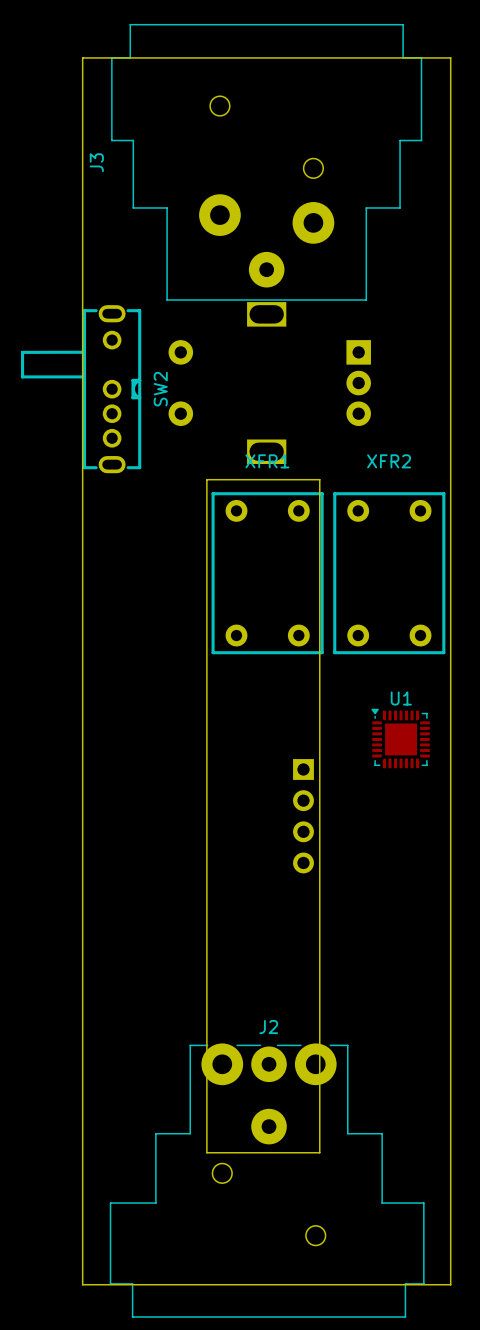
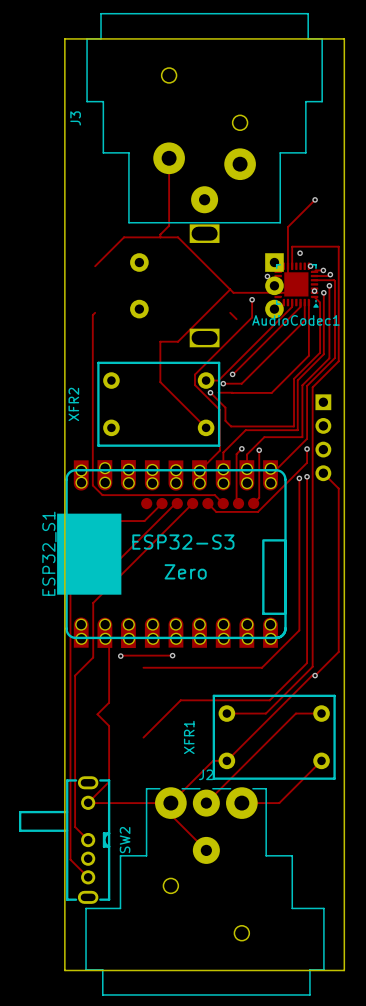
track: none -> (169, 158) (169, 225) (160, 234) (160, 237)
track: none -> (315, 199) (287, 227) (287, 276) (296, 284) (287, 292) (233, 292) (178, 237) (124, 237) (95, 266)
via: none -> (315, 199)
via: none -> (300, 253)
track: none -> (292, 266) (292, 246) (338, 246) (338, 361) (312, 387) (312, 666) (265, 713) (226, 713)
via: none -> (310, 266)
track: none -> (323, 270) (314, 271)
via: none -> (323, 270)
track: none -> (330, 274) (314, 276)
via: none -> (330, 274)
via: none -> (267, 276)
track: none -> (314, 280) (335, 281) (335, 358) (307, 385) (307, 438) (270, 475)
AudioCodec1: none -> (296, 285)
track: none -> (329, 285) (329, 358) (302, 385) (302, 437) (264, 437) (247, 454) (247, 469)
via: none -> (329, 285)
track: none -> (230, 289) (178, 341) (160, 341) (160, 382) (206, 427)
SW2 position: (81, 389) -> (64, 840)
via: none -> (314, 291)
track: none -> (323, 292) (323, 354) (297, 380) (297, 430) (245, 430) (223, 452) (223, 469)
via: none -> (323, 292)
track: none -> (314, 296) (320, 302) (320, 352) (294, 378) (294, 426) (231, 426) (225, 420) (225, 407) (210, 392)
track: none -> (252, 299) (252, 317) (194, 374) (194, 385) (219, 410) (219, 450) (199, 470)
via: none -> (252, 299)
track: none -> (292, 302) (292, 306) (218, 380) (206, 380)
track: none -> (300, 302) (300, 306) (232, 374)
track: none -> (304, 302) (304, 320) (241, 383) (223, 383)
track: none -> (308, 302) (308, 355) (271, 392) (218, 392)
track: none -> (95, 312) (92, 315) (92, 485) (102, 495) (214, 495) (223, 503)
track: none -> (230, 312) (236, 319)
via: none -> (232, 374)
via: none -> (223, 383)
via: none -> (210, 392)
XFR1 rotation: 0° (272, 573) -> 90° counterclockwise (274, 733)
XFR1 position: (272, 573) -> (274, 733)
XFR2 rotation: 0° (394, 573) -> 90° counterclockwise (158, 400)
XFR2 position: (394, 573) -> (158, 400)
part: none -> (323, 437)
track: none -> (241, 448) (236, 454) (236, 501) (238, 503)
via: none -> (241, 448)
track: none -> (307, 449) (307, 462) (257, 511) (216, 511) (207, 503)
via: none -> (307, 449)
track: none -> (259, 450) (259, 497) (253, 503)
via: none -> (259, 450)
track: none -> (323, 473) (338, 488) (338, 651) (315, 675) (312, 675) (226, 760) (213, 760) (170, 803)
track: none -> (307, 476) (307, 663) (269, 700) (180, 700) (143, 737)
via: none -> (307, 476)
track: none -> (299, 478) (299, 630) (262, 667) (143, 667)
via: none -> (299, 478)
track: none -> (162, 503) (144, 521) (81, 521) (70, 531) (70, 859) (88, 877)
track: none -> (177, 503) (90, 588)
track: none -> (192, 503) (93, 602) (93, 657) (75, 675) (75, 827) (88, 840)
ESP32_S1: none -> (171, 554)
U1: (400, 738) -> none
part: (263, 816) -> none
track: none -> (104, 632) (109, 639) (109, 702) (97, 714) (109, 725) (109, 781) (88, 802) (170, 803)
via: none -> (120, 656)
track: none -> (172, 655) (120, 656)
via: none -> (172, 655)
via: none -> (315, 675)
track: none -> (321, 713) (295, 713) (206, 803)
track: none -> (321, 760) (279, 803) (241, 803)
track: none -> (170, 803) (170, 814) (206, 850)

